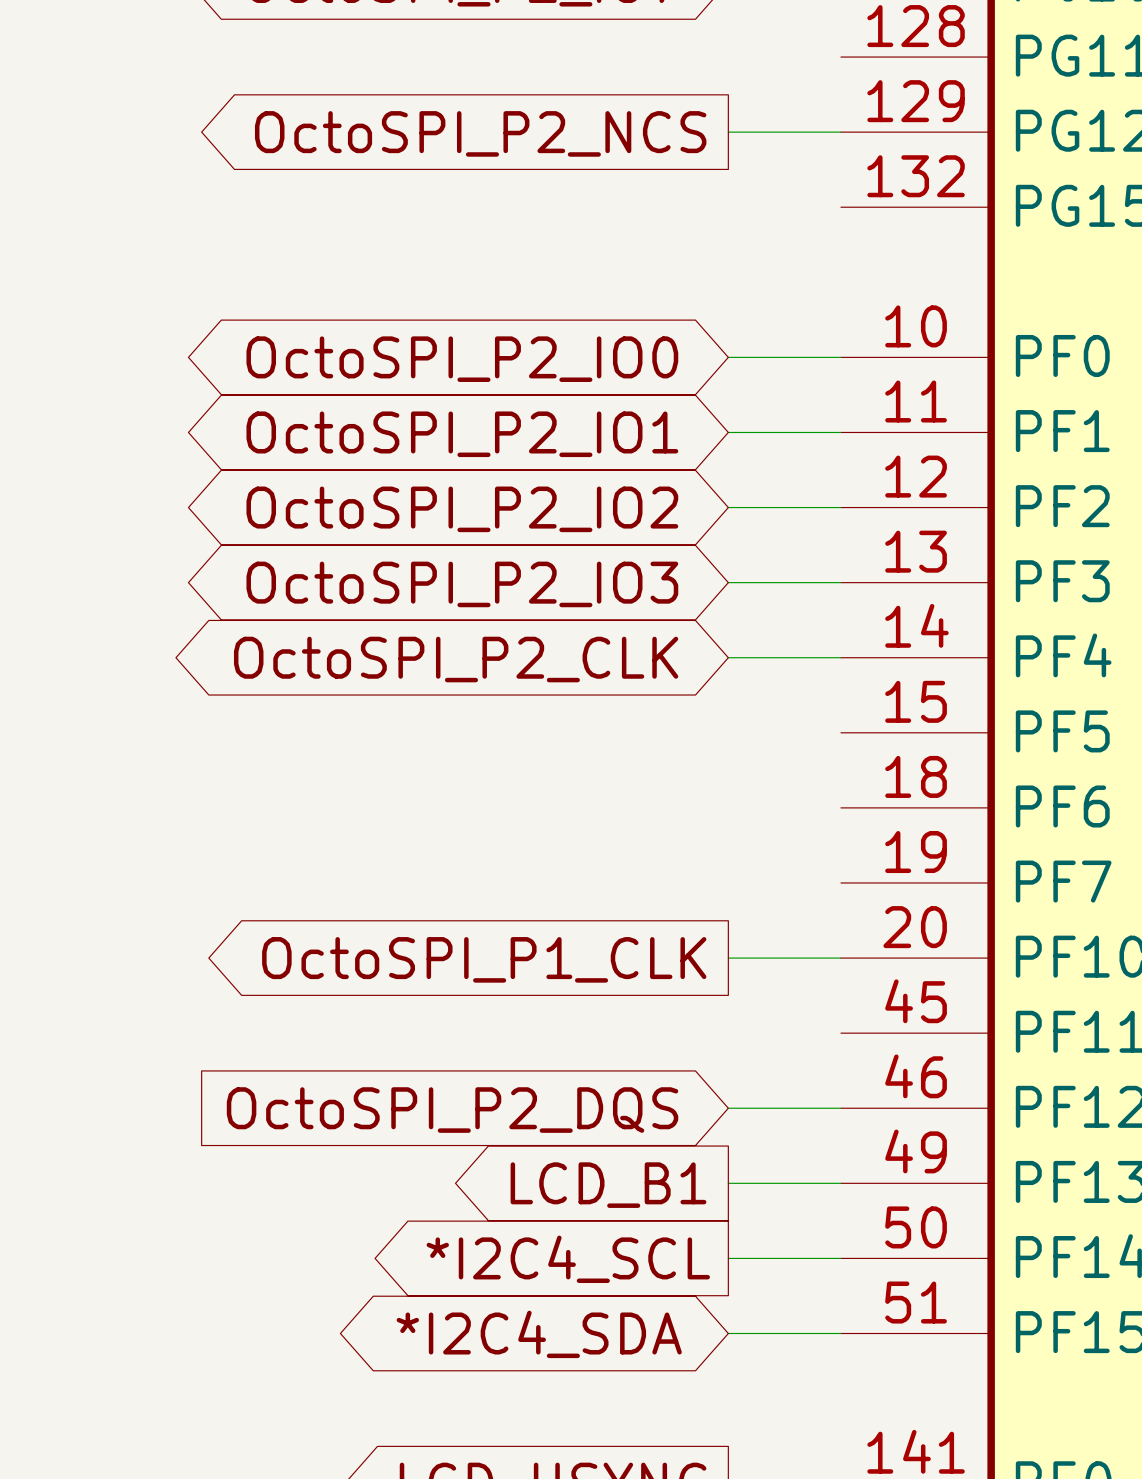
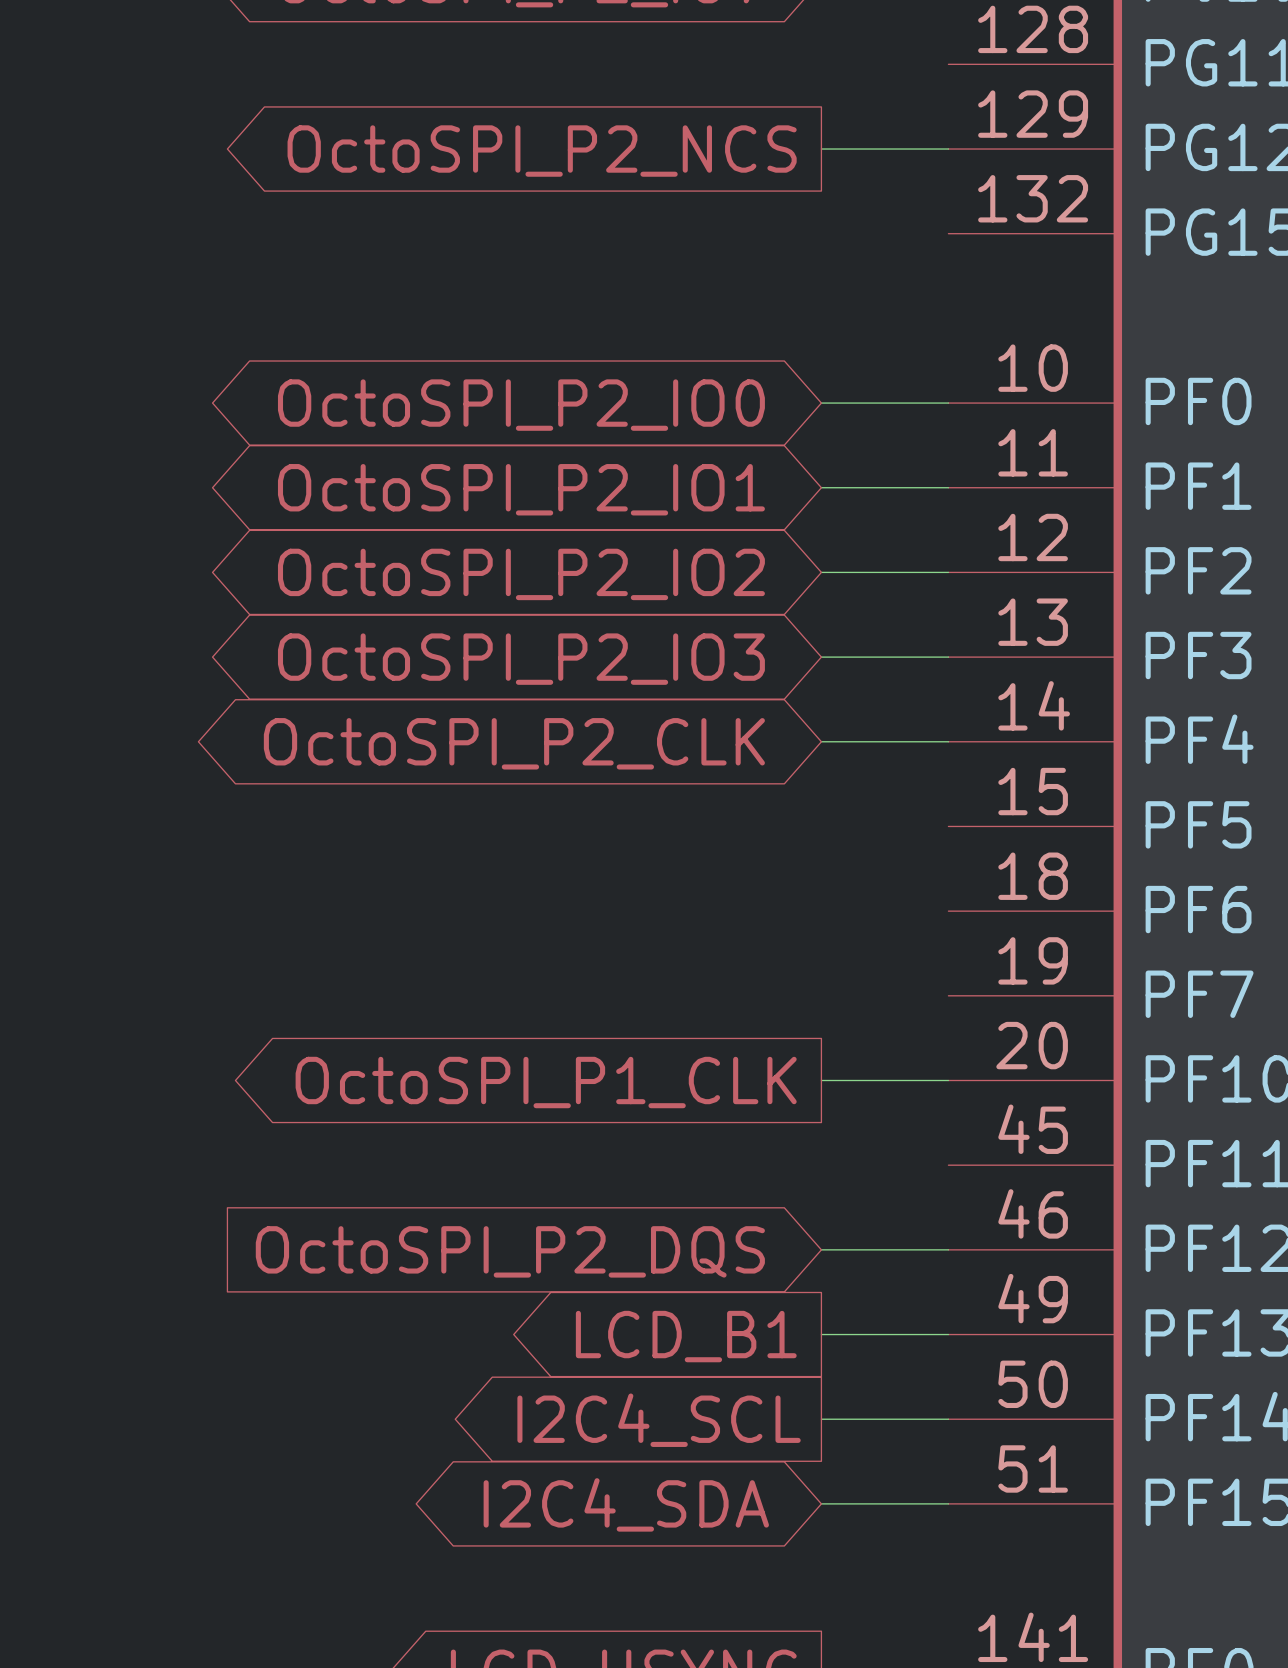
global label: *I2C4_SCL (568, 1259) -> I2C4_SCL (659, 1420)
global label: *I2C4_SDA (539, 1334) -> I2C4_SDA (626, 1504)

